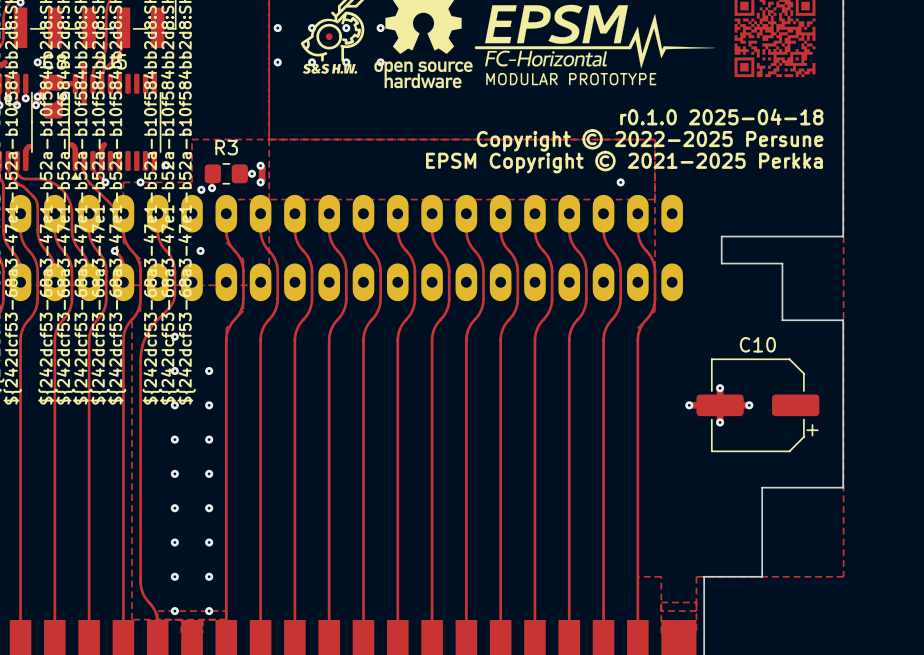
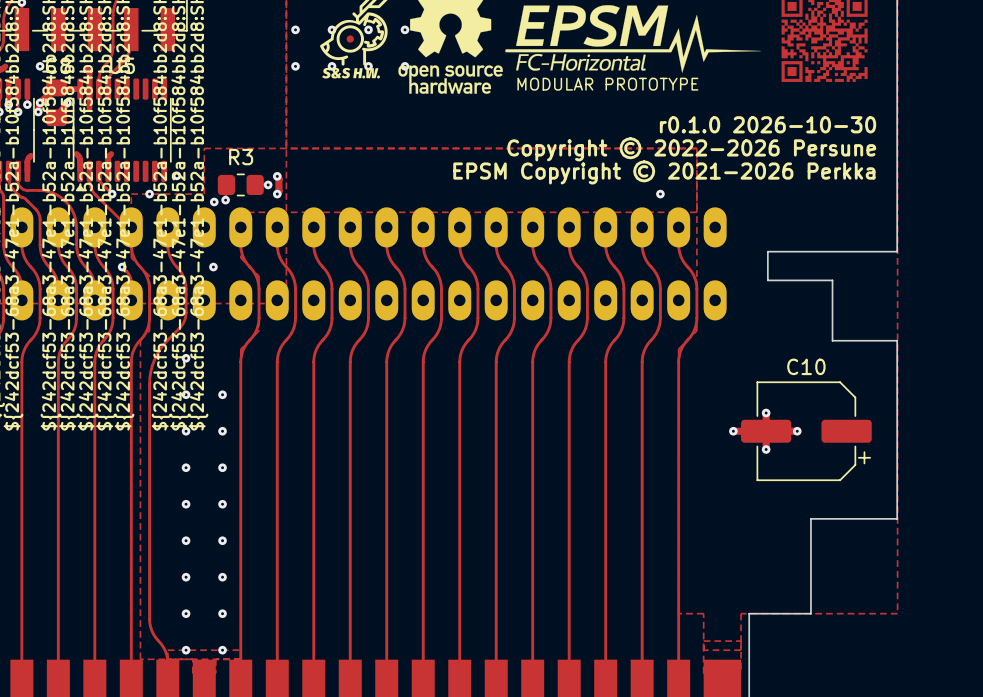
text: r0.1.0 2025-04-18 (721, 116) -> r0.1.0 2026-10-30 (768, 124)
text: Copyright © 2022-2025 Persune (650, 140) -> Copyright © 2022-2026 Persune (691, 149)
text: EPSM Copyright © 2021-2025 Perkka (624, 162) -> EPSM Copyright © 2021-2026 Perkka (664, 172)

